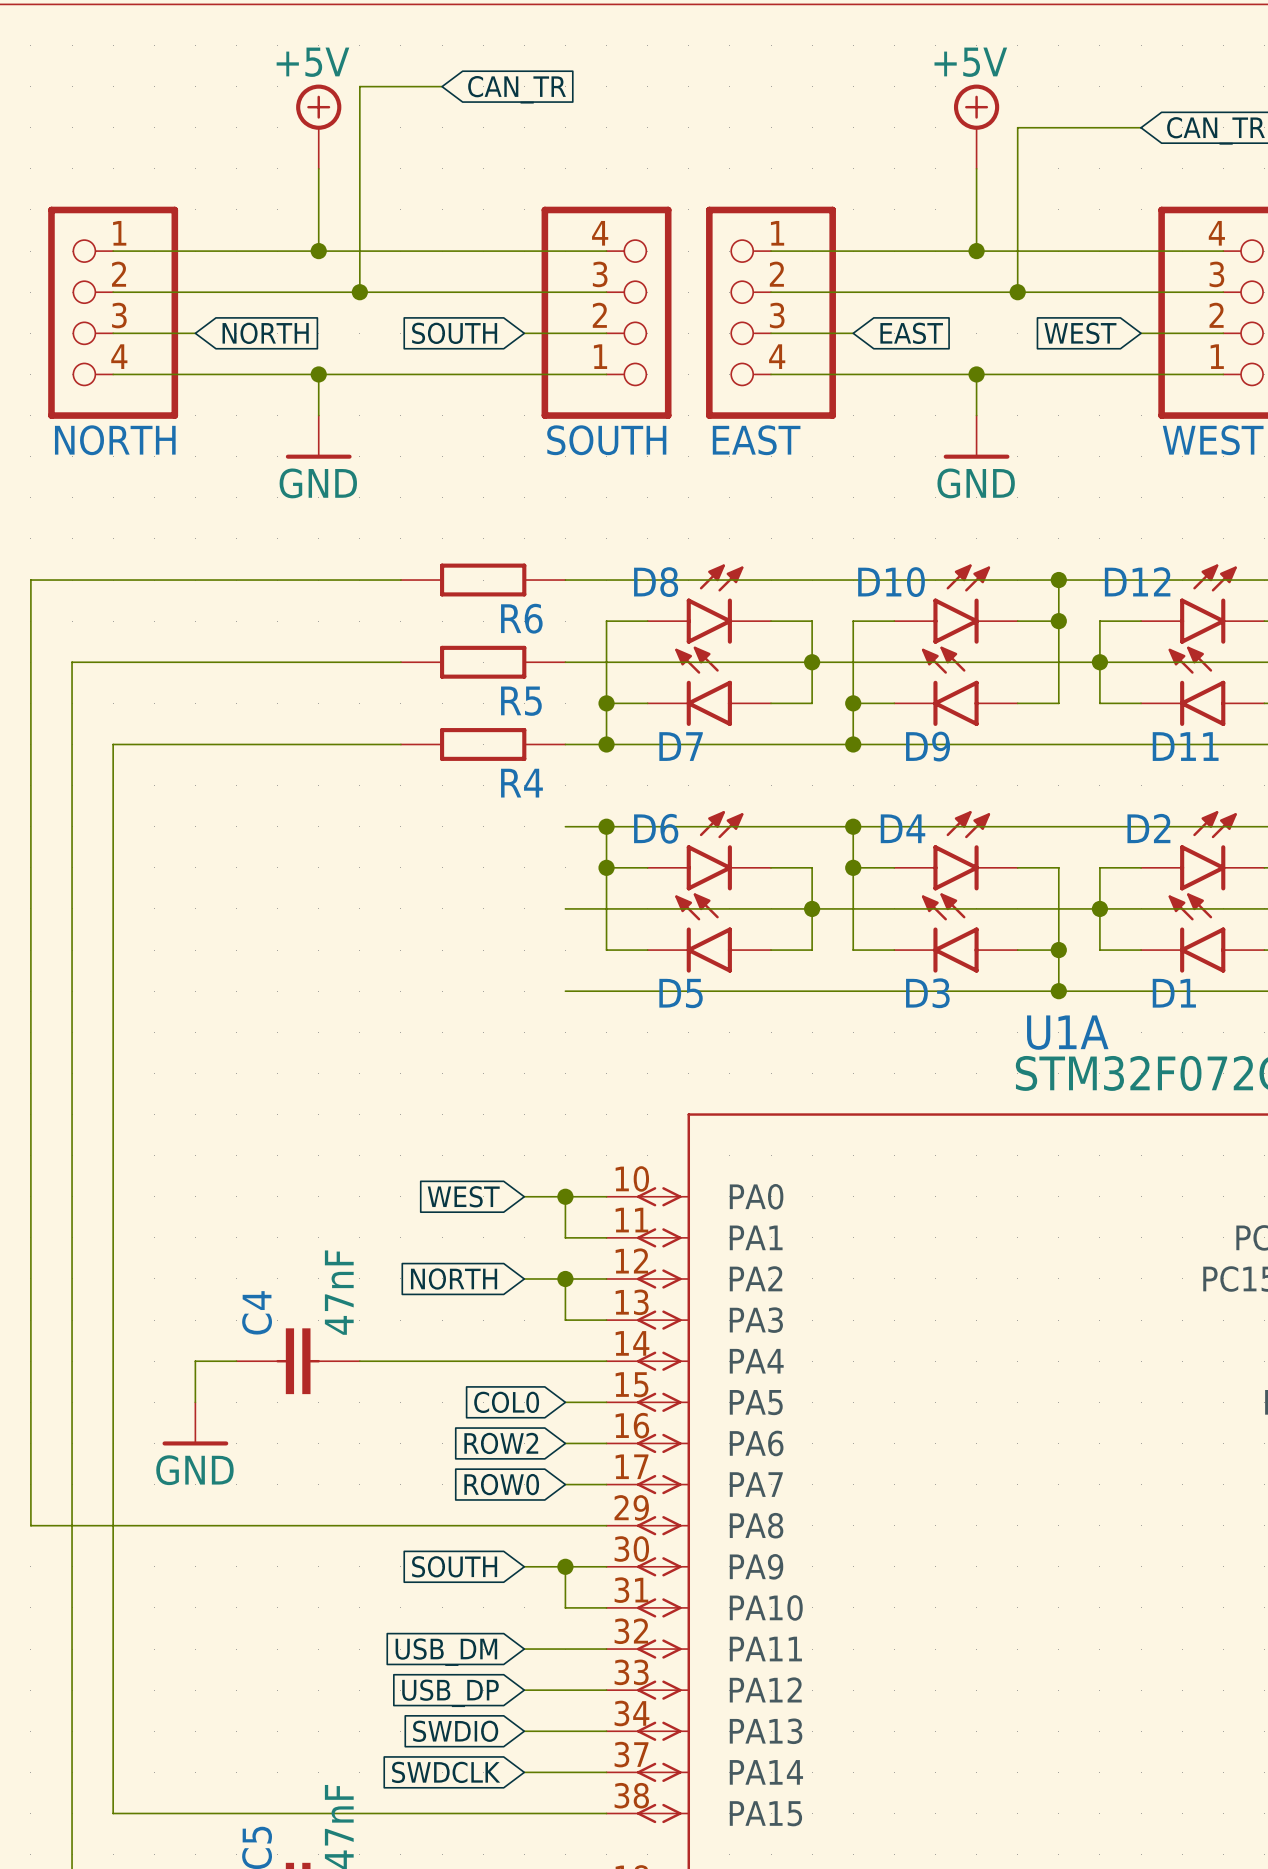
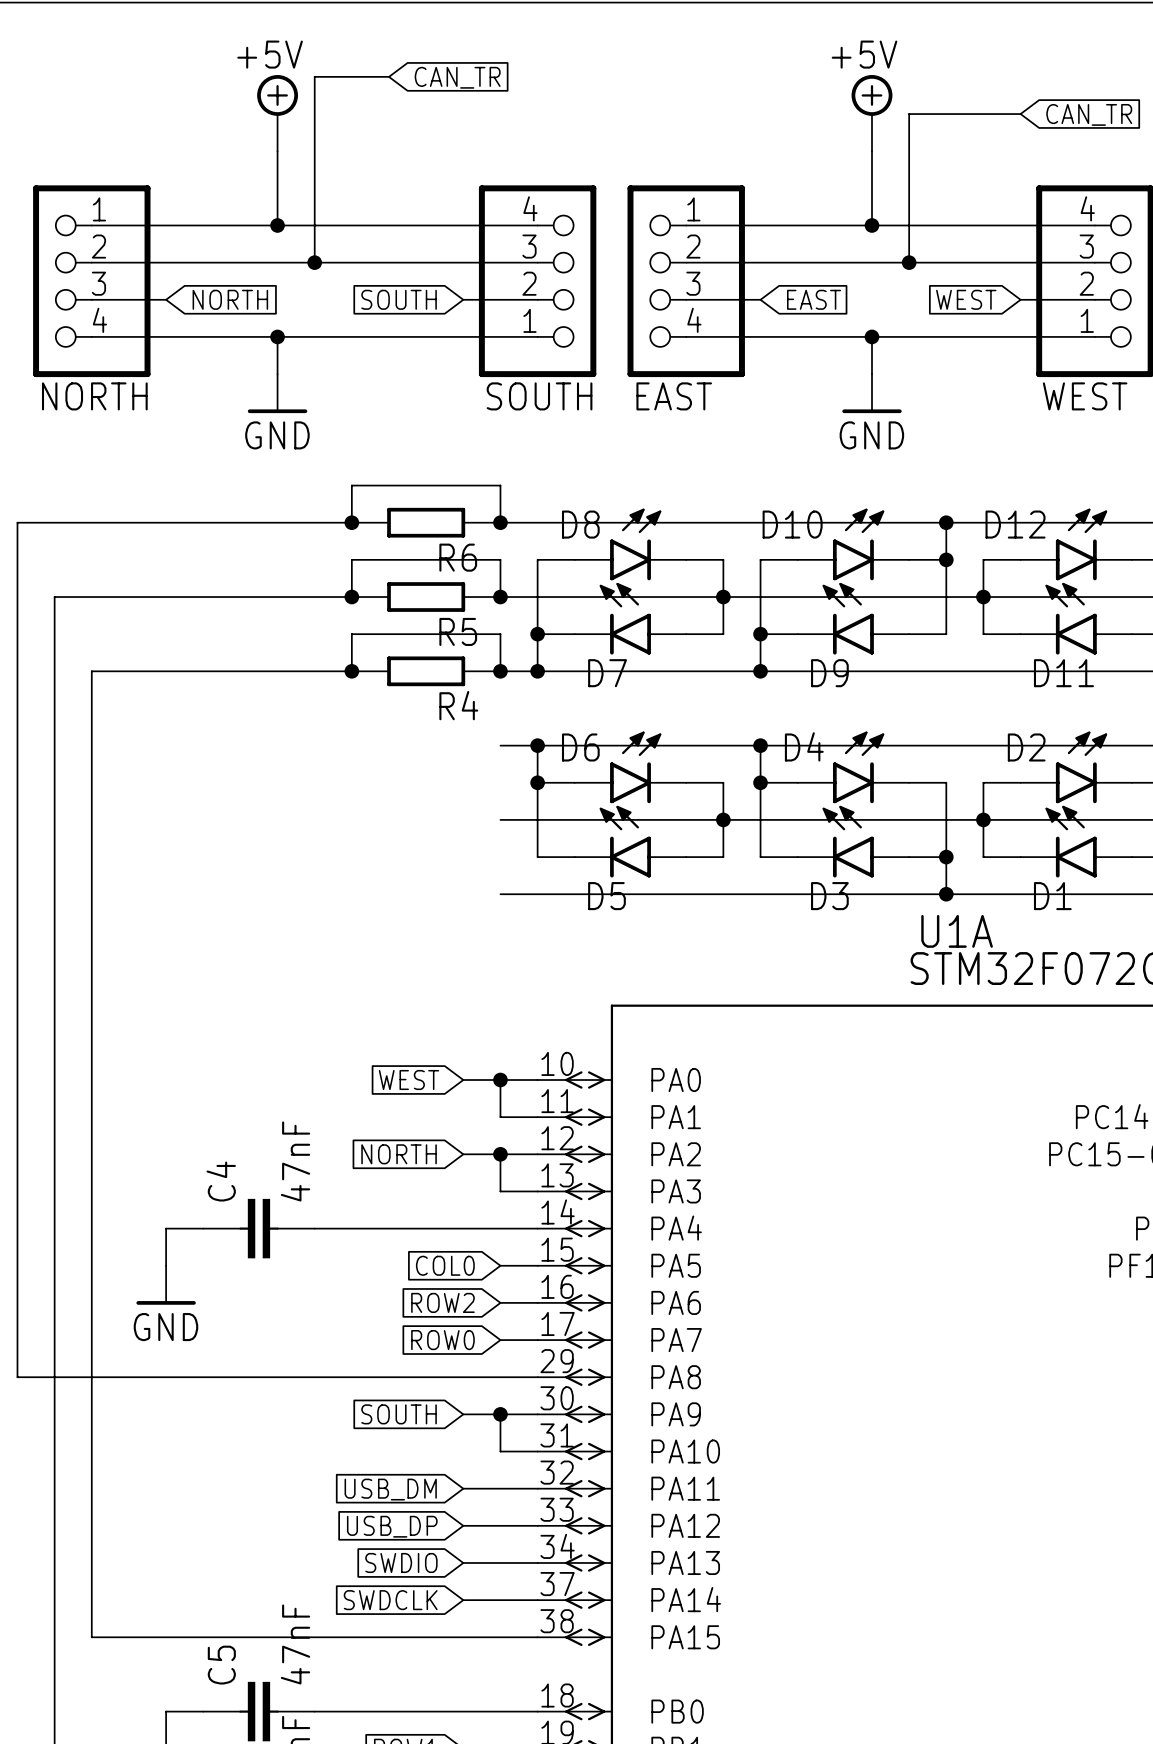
wire: none -> (351, 522) (351, 485) (500, 485) (500, 522)
junction: none -> (351, 522)
junction: none -> (500, 522)
wire: none -> (351, 597) (351, 559) (500, 559) (500, 597)
junction: none -> (351, 597)
junction: none -> (500, 597)
wire: none -> (351, 671) (351, 634) (500, 634) (500, 671)
junction: none -> (351, 671)
junction: none -> (500, 671)

